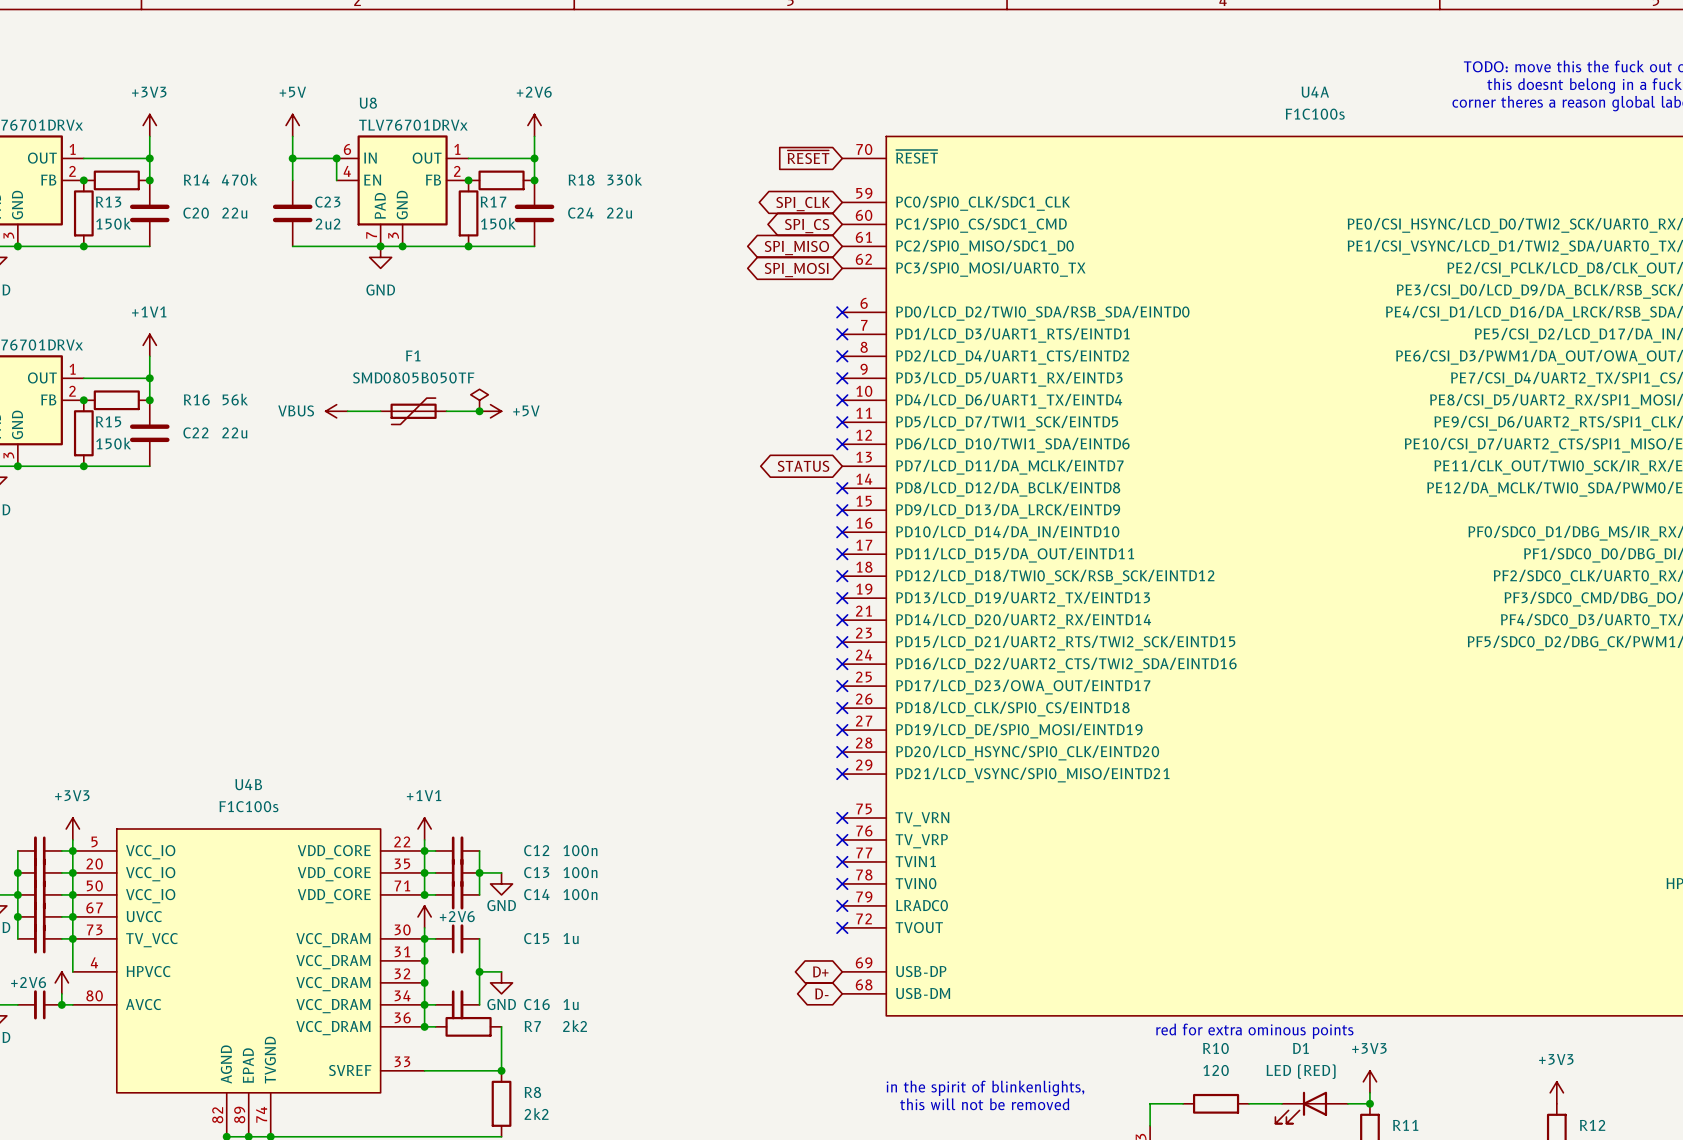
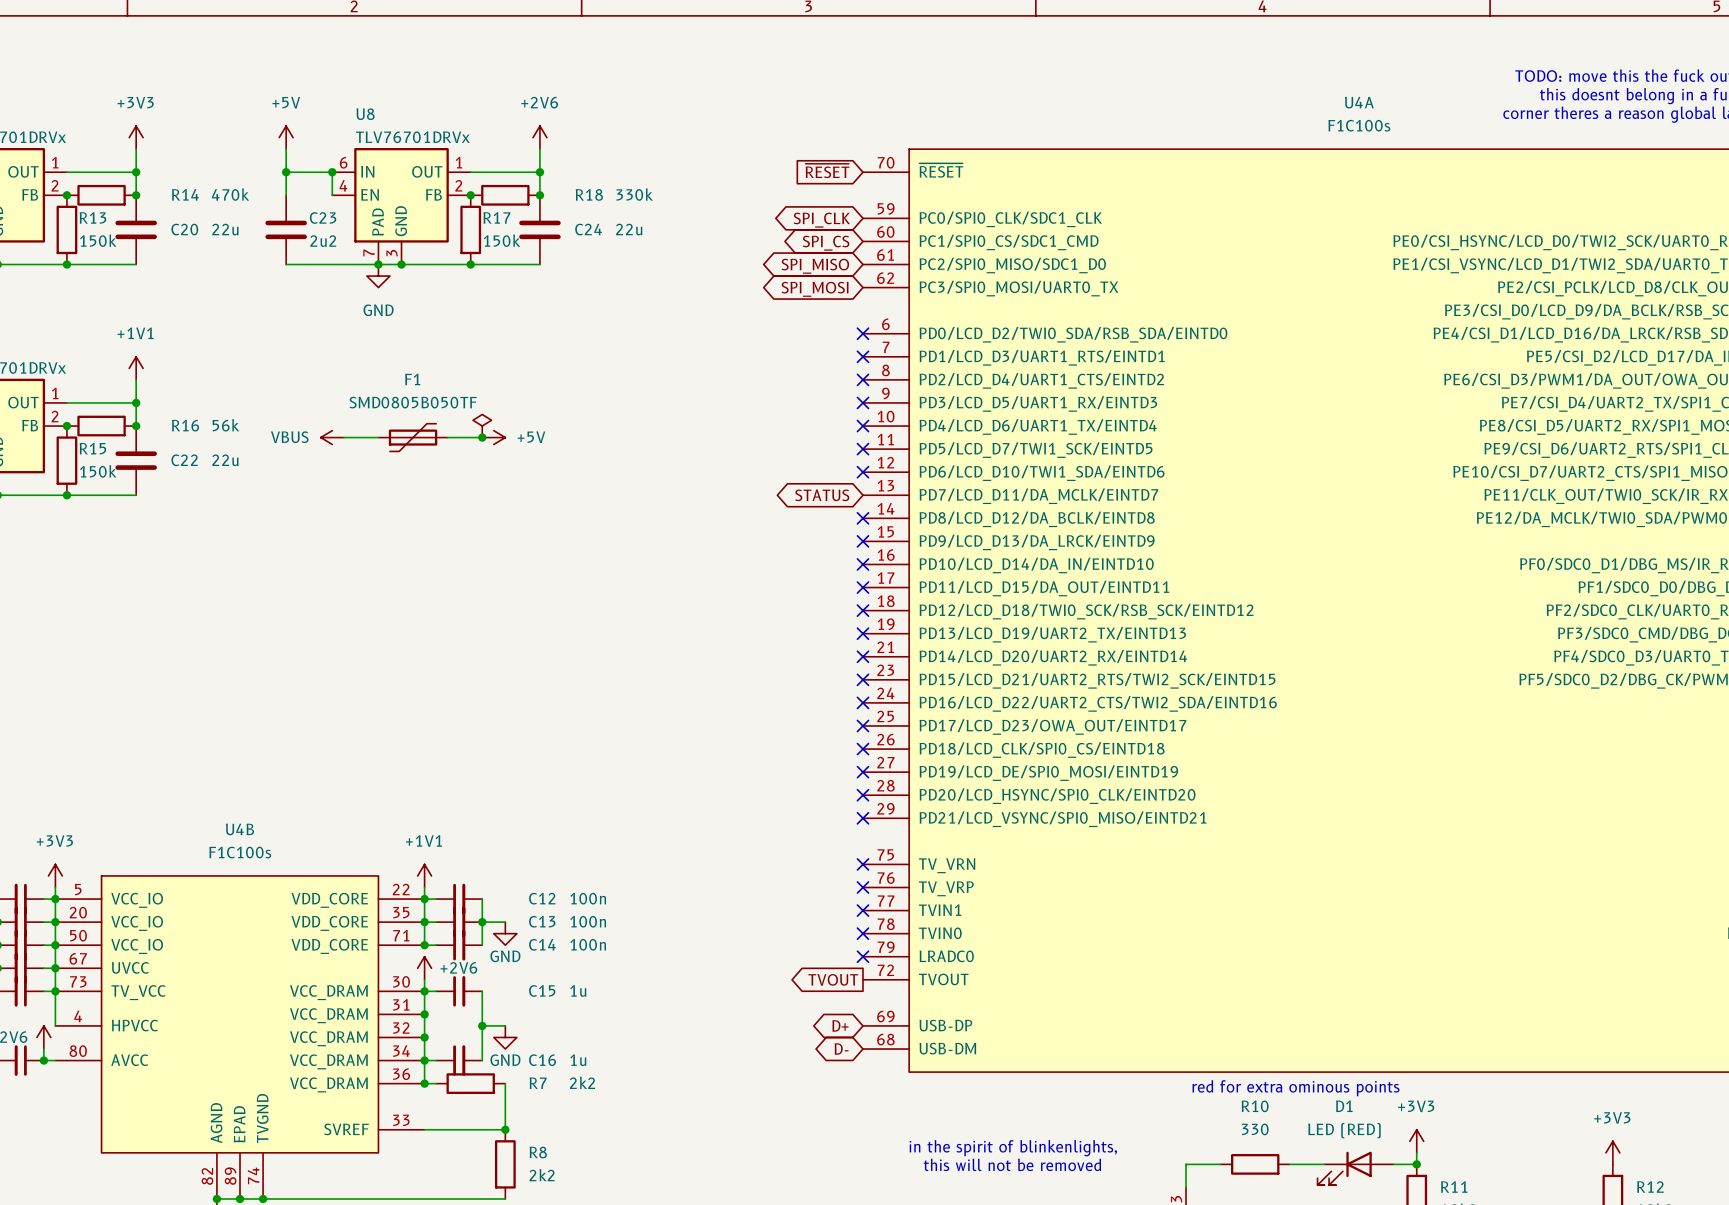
no-connect mark: (842, 927) -> none
global label: none -> TVOUT (833, 979)
R10 value: 120 (1216, 1070) -> 330 (1255, 1129)

